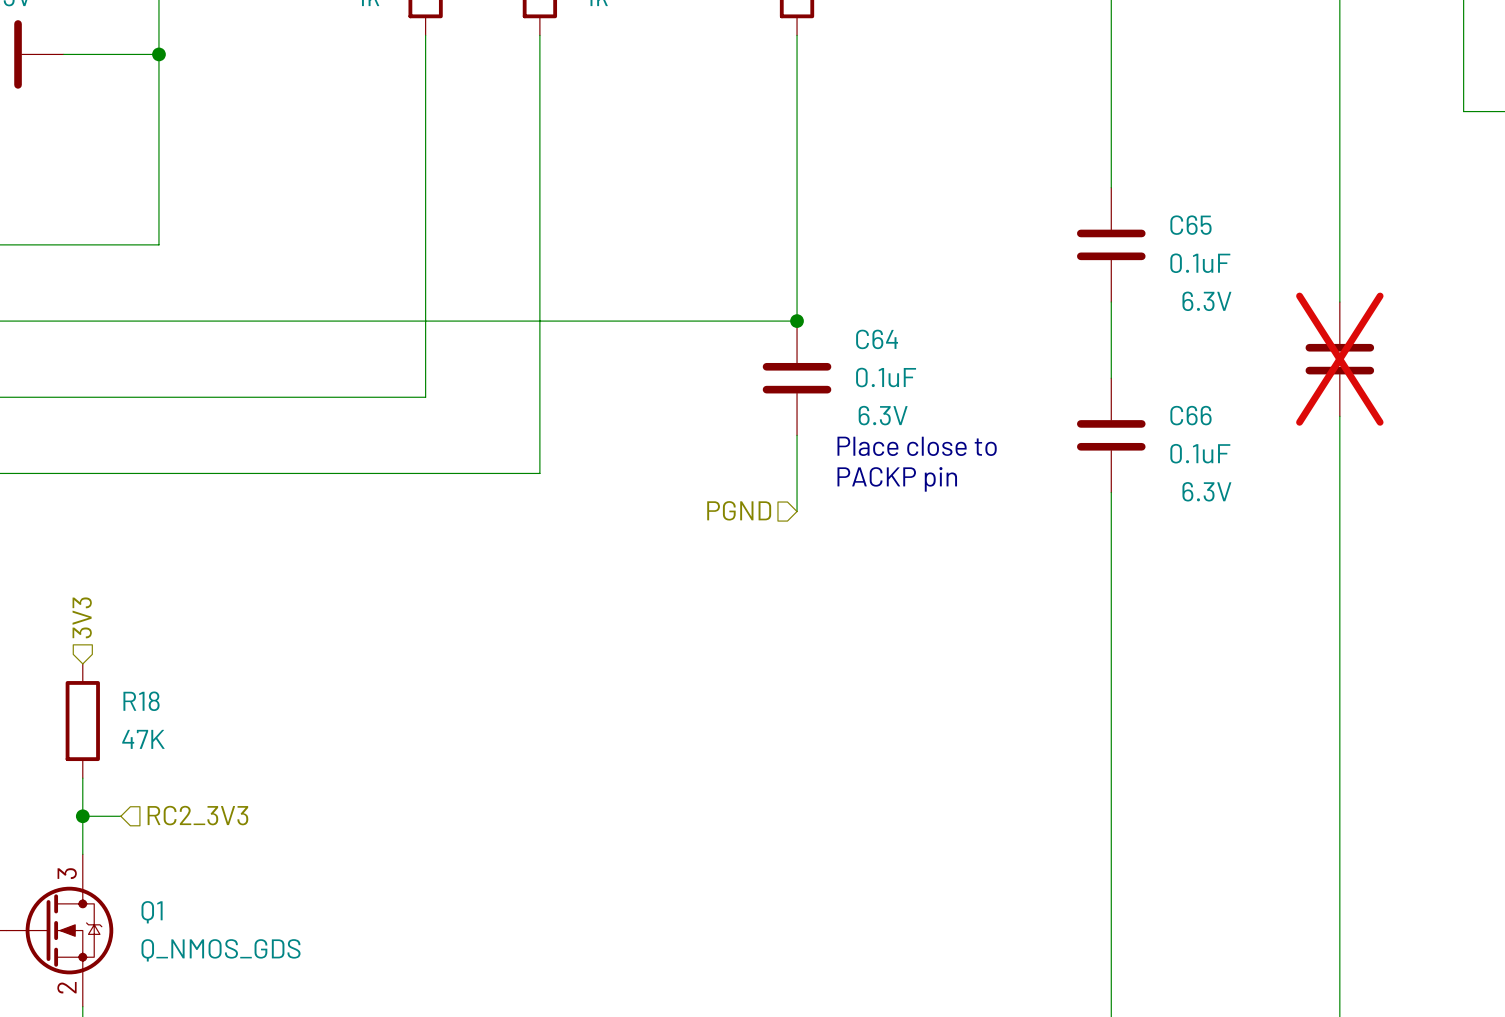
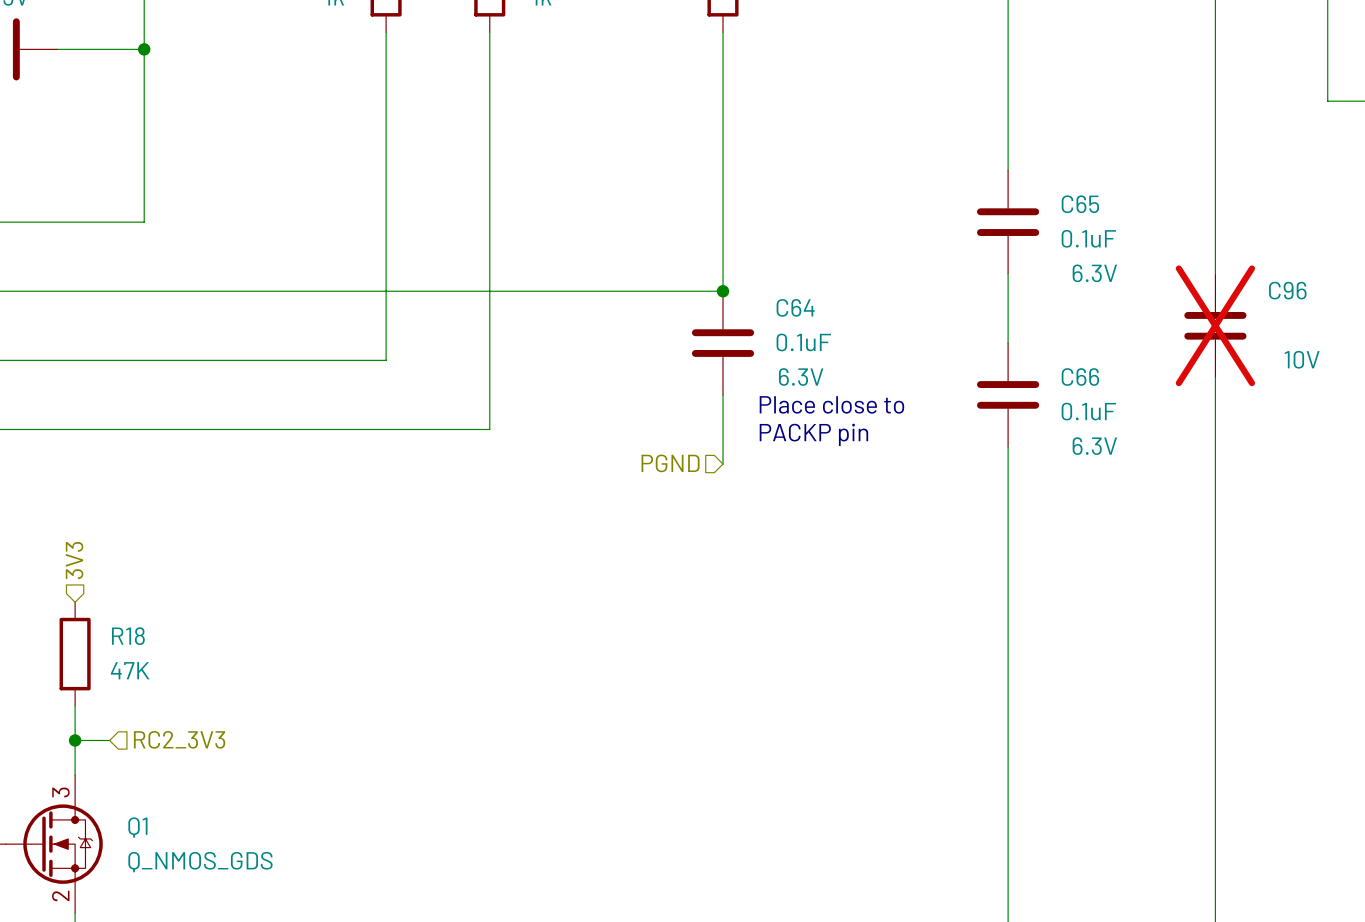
C96 name: none -> C96 (1287, 290)
C96 text: none -> 10V (1302, 359)

